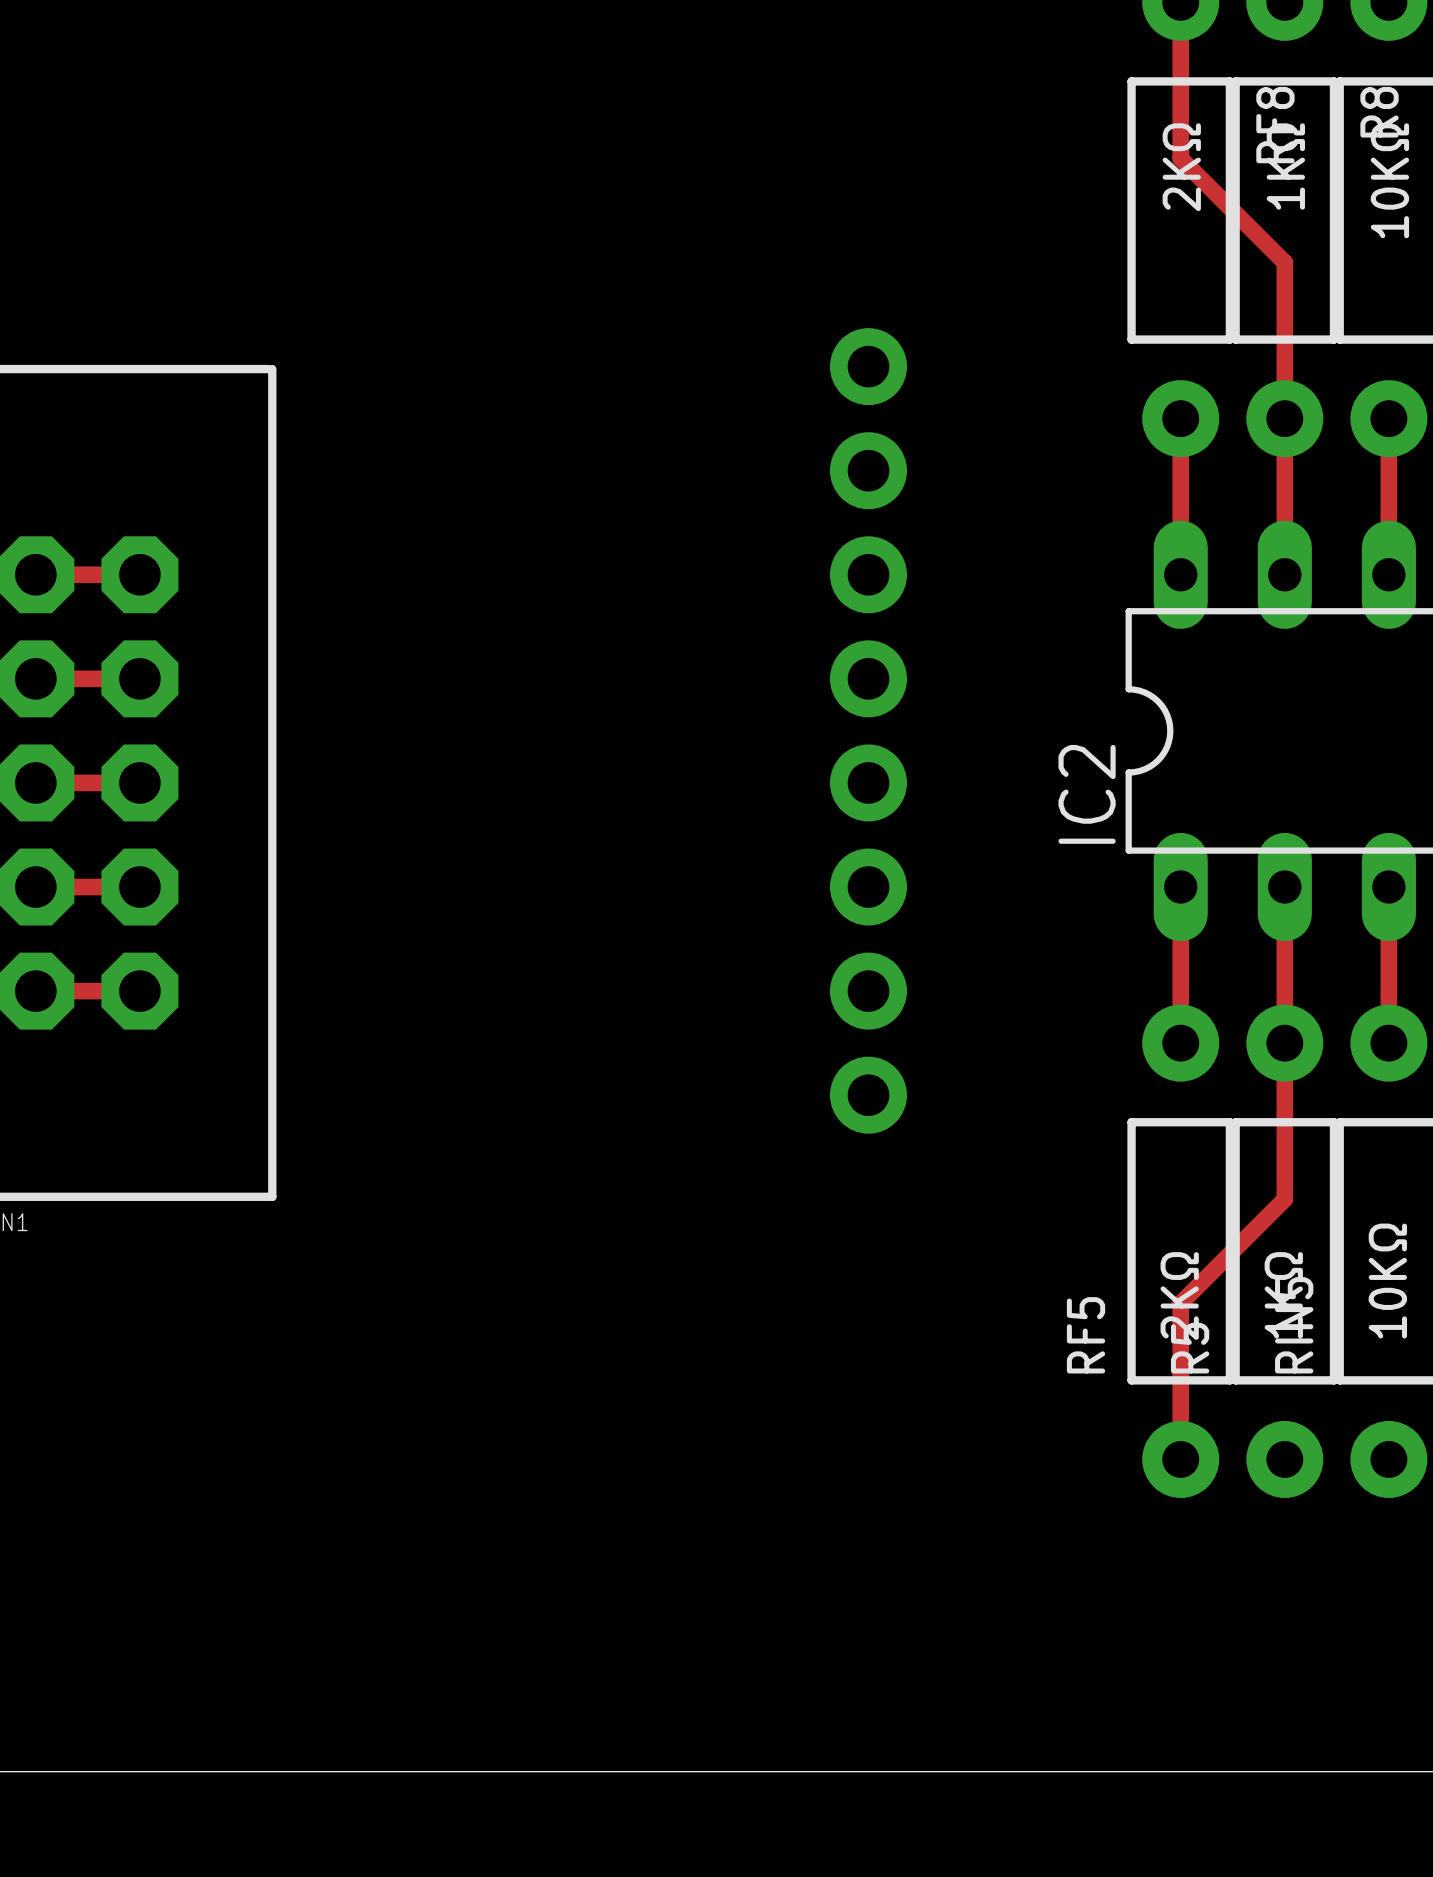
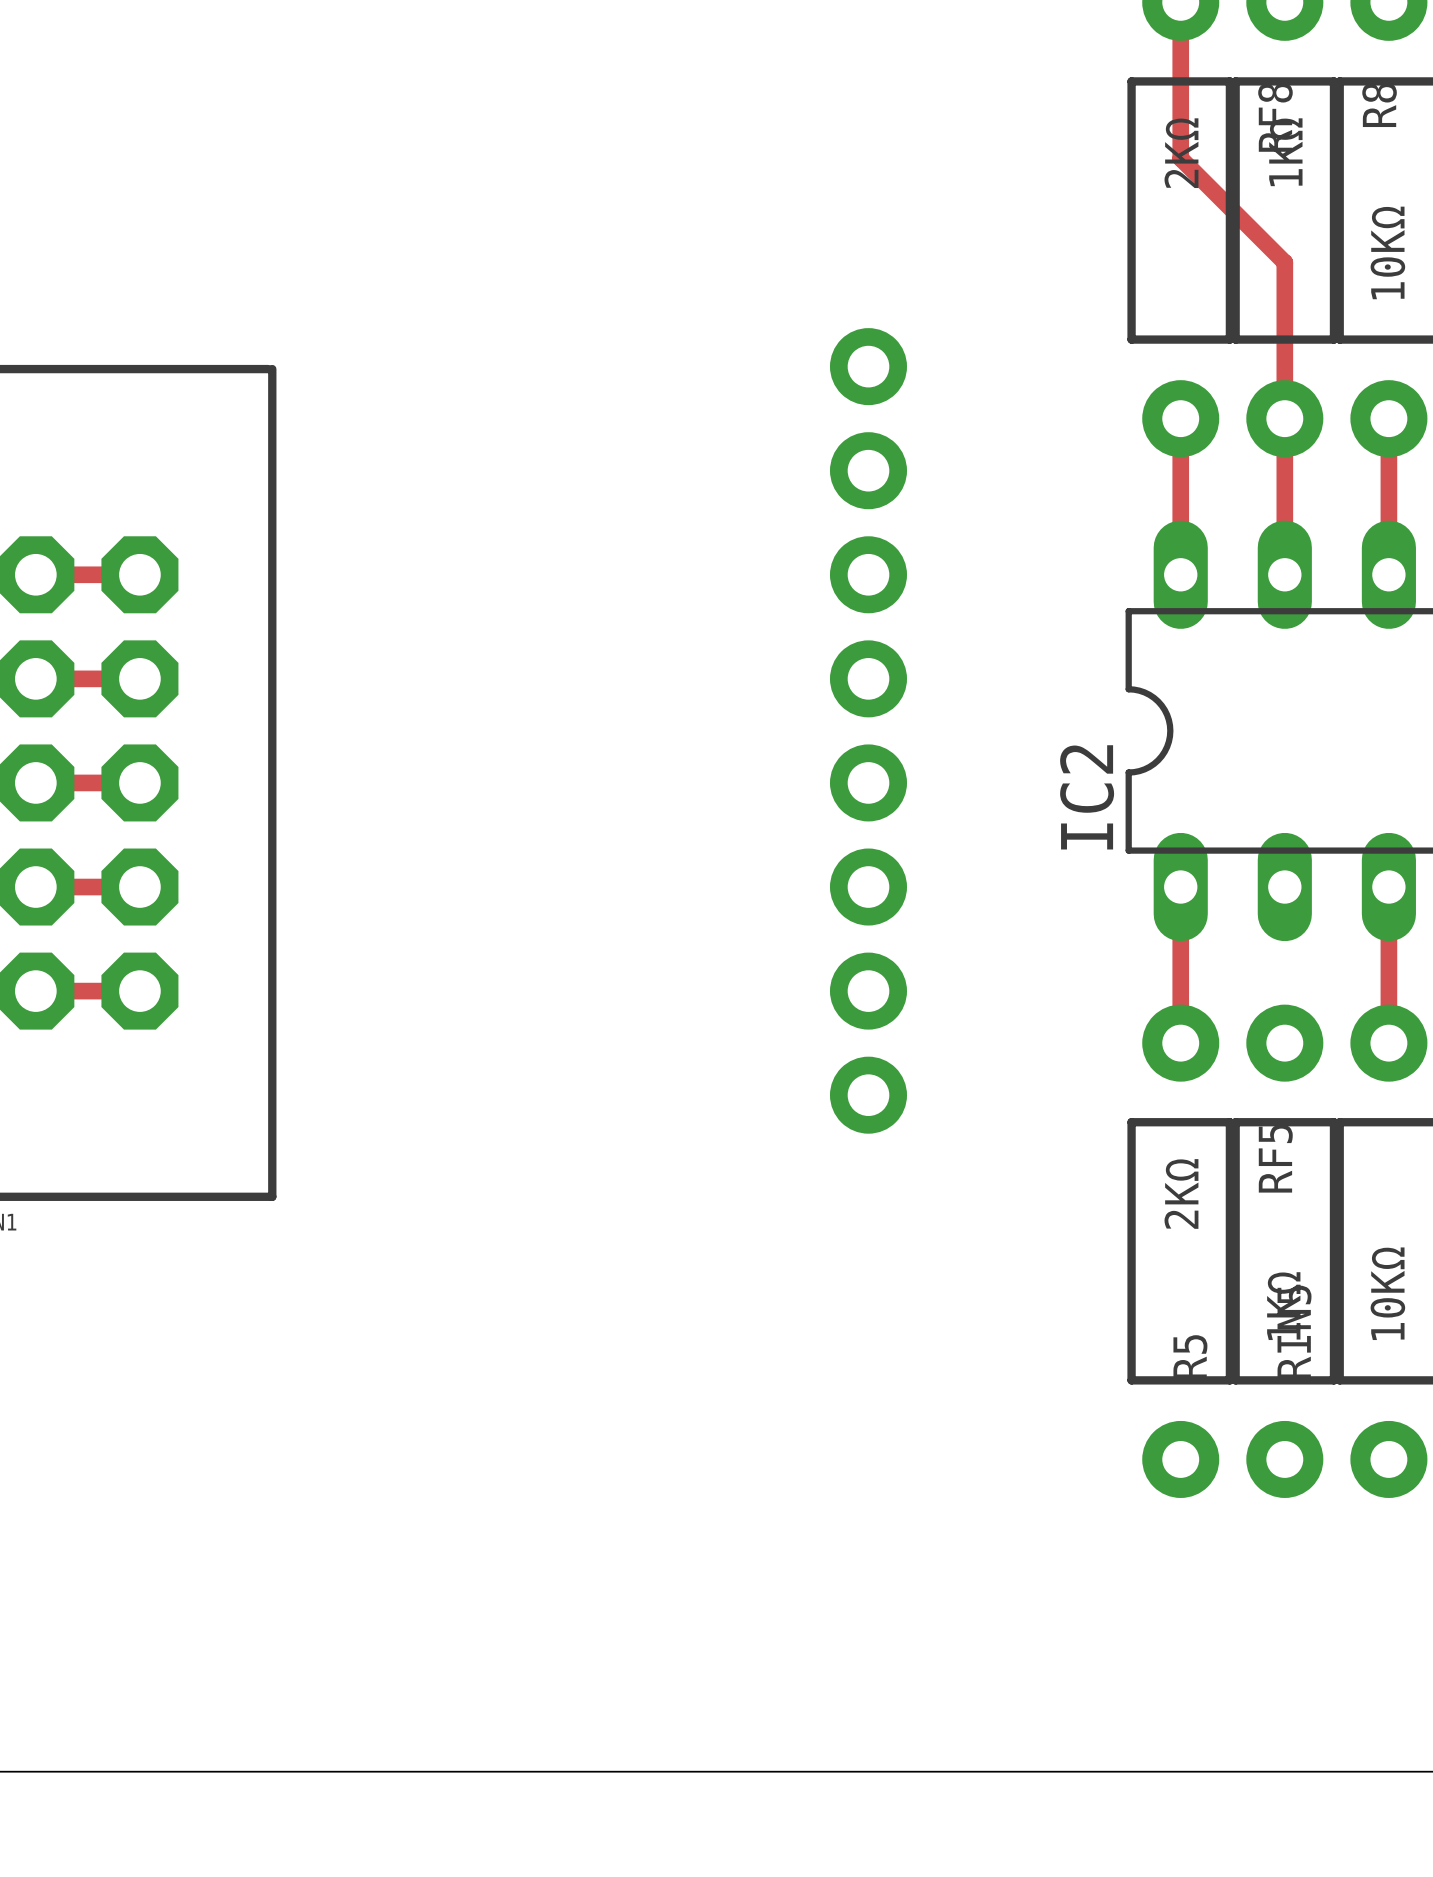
part value position: 10KΩ (1389, 180) -> 10KΩ (1387, 252)
track: (1284, 887) (1284, 1199) (1180, 1303) (1180, 1459) -> none
RF5 value position: 2KΩ (1179, 1296) -> 2KΩ (1181, 1193)
RF5 name position: RF5 (1086, 1335) -> RF5 (1275, 1158)

